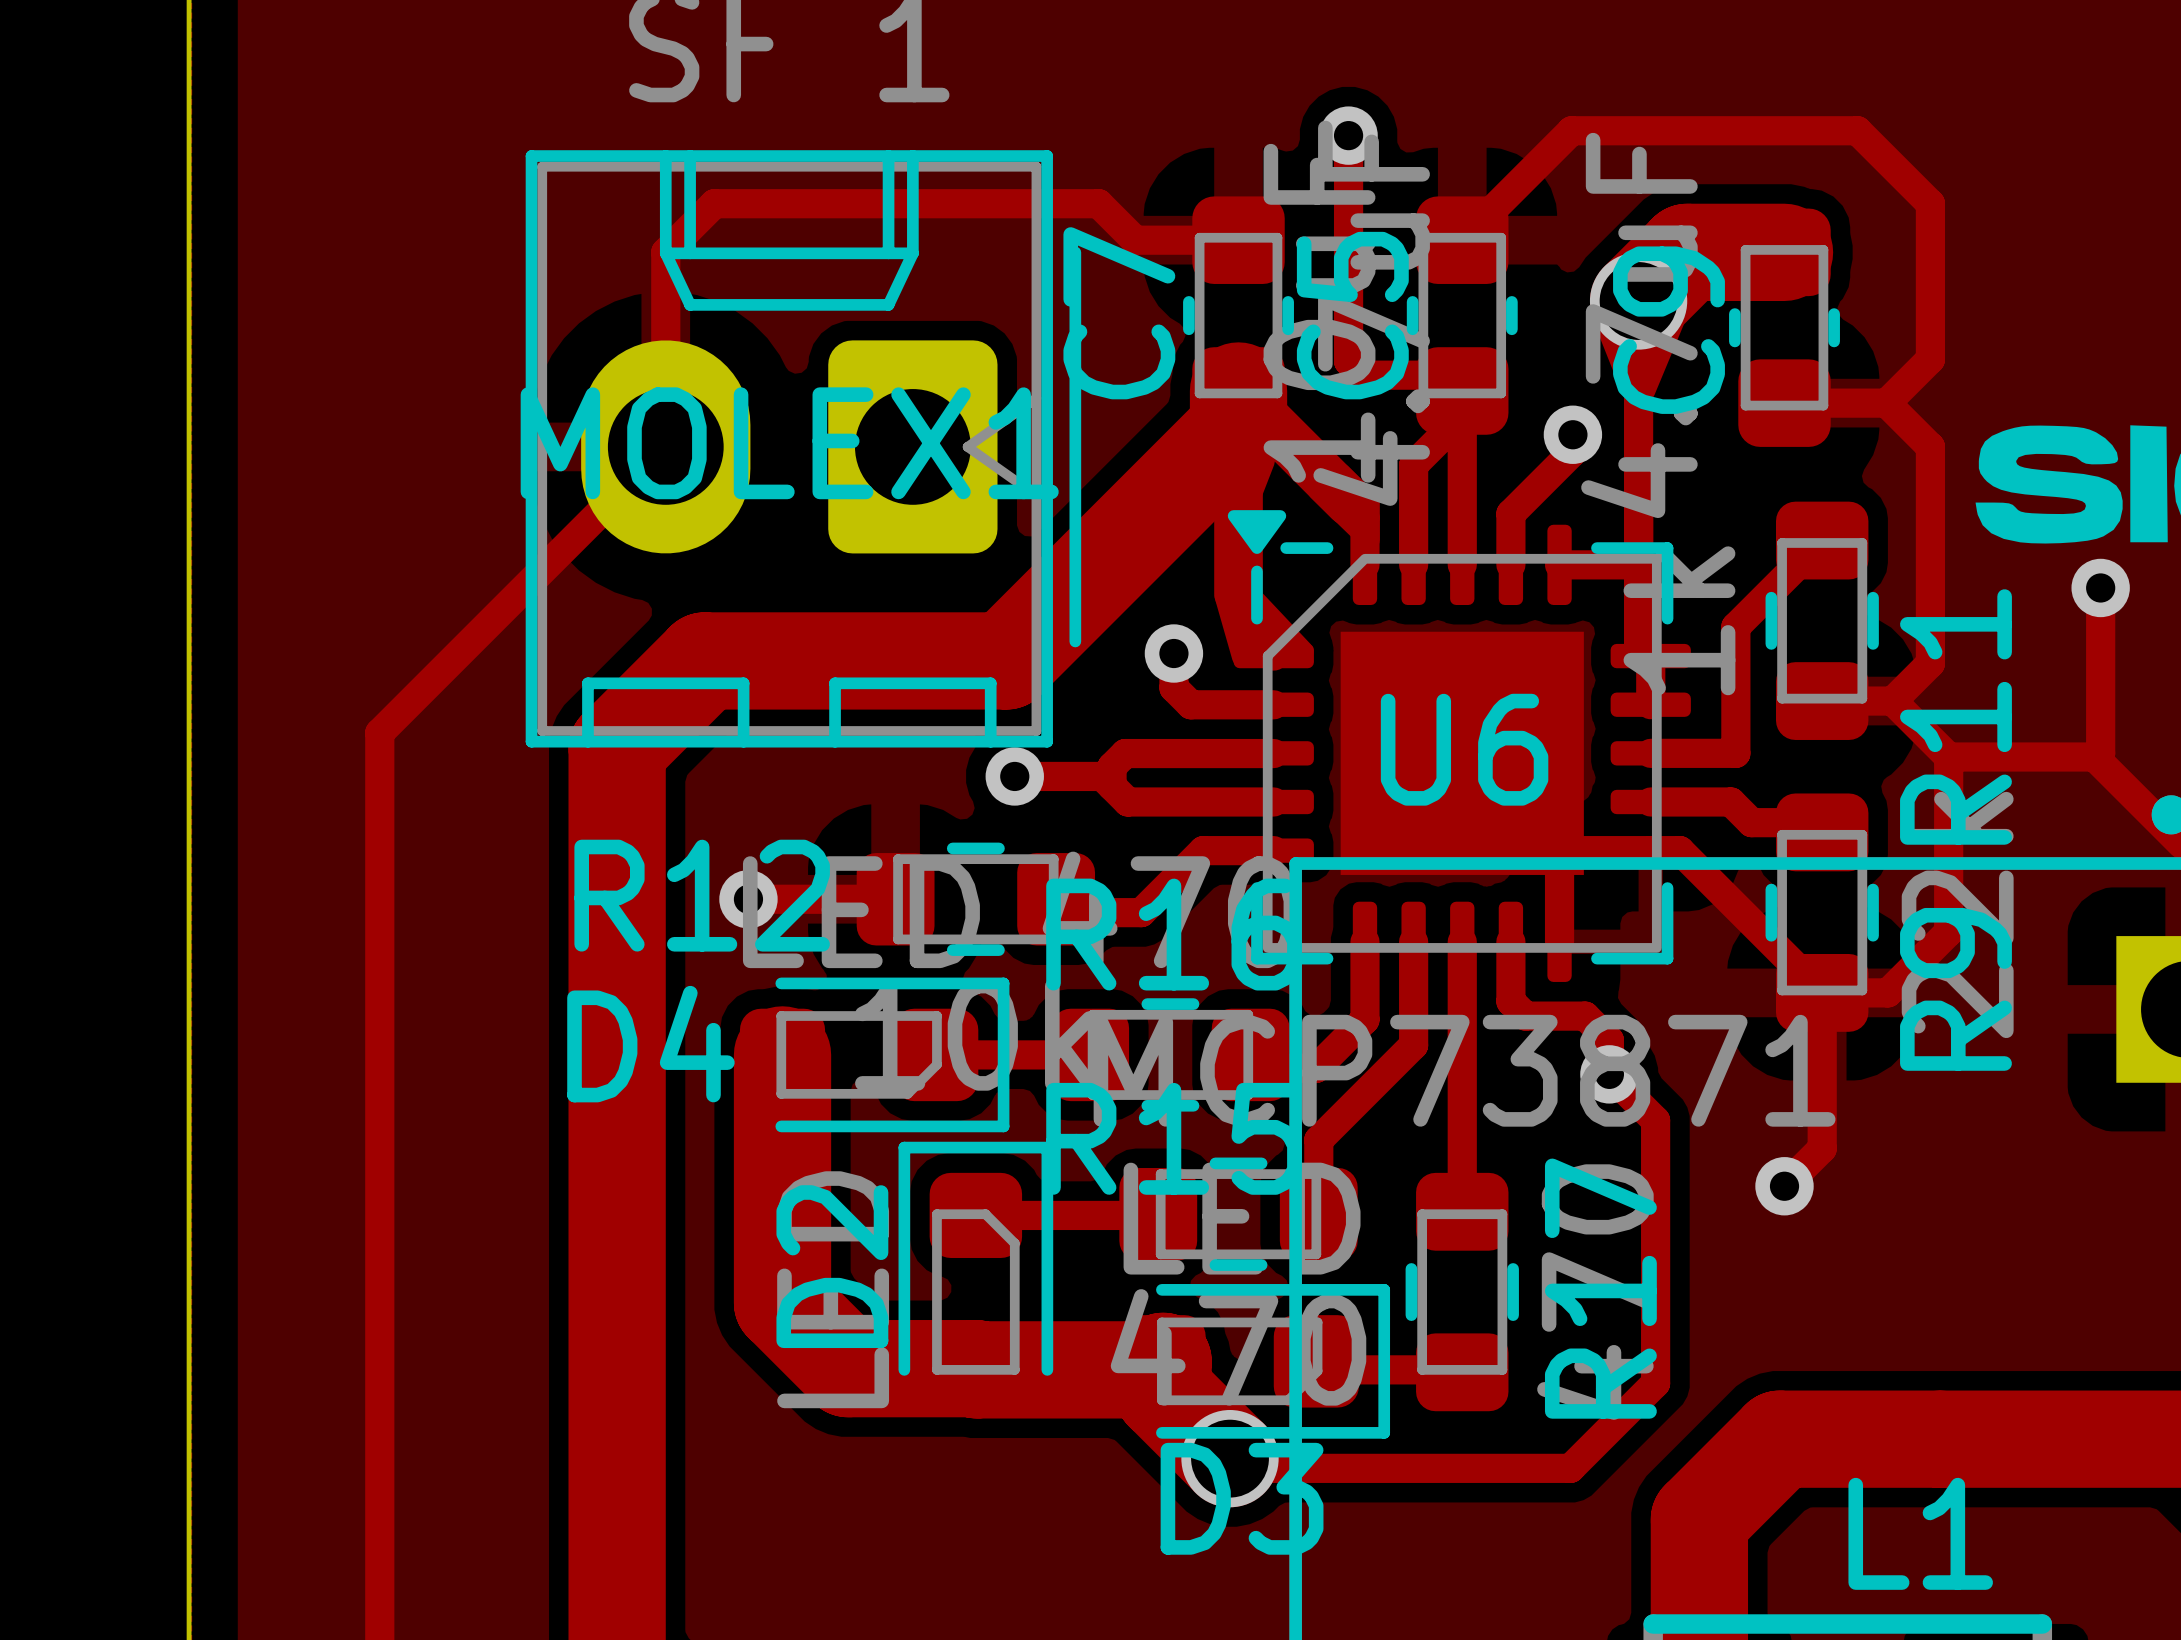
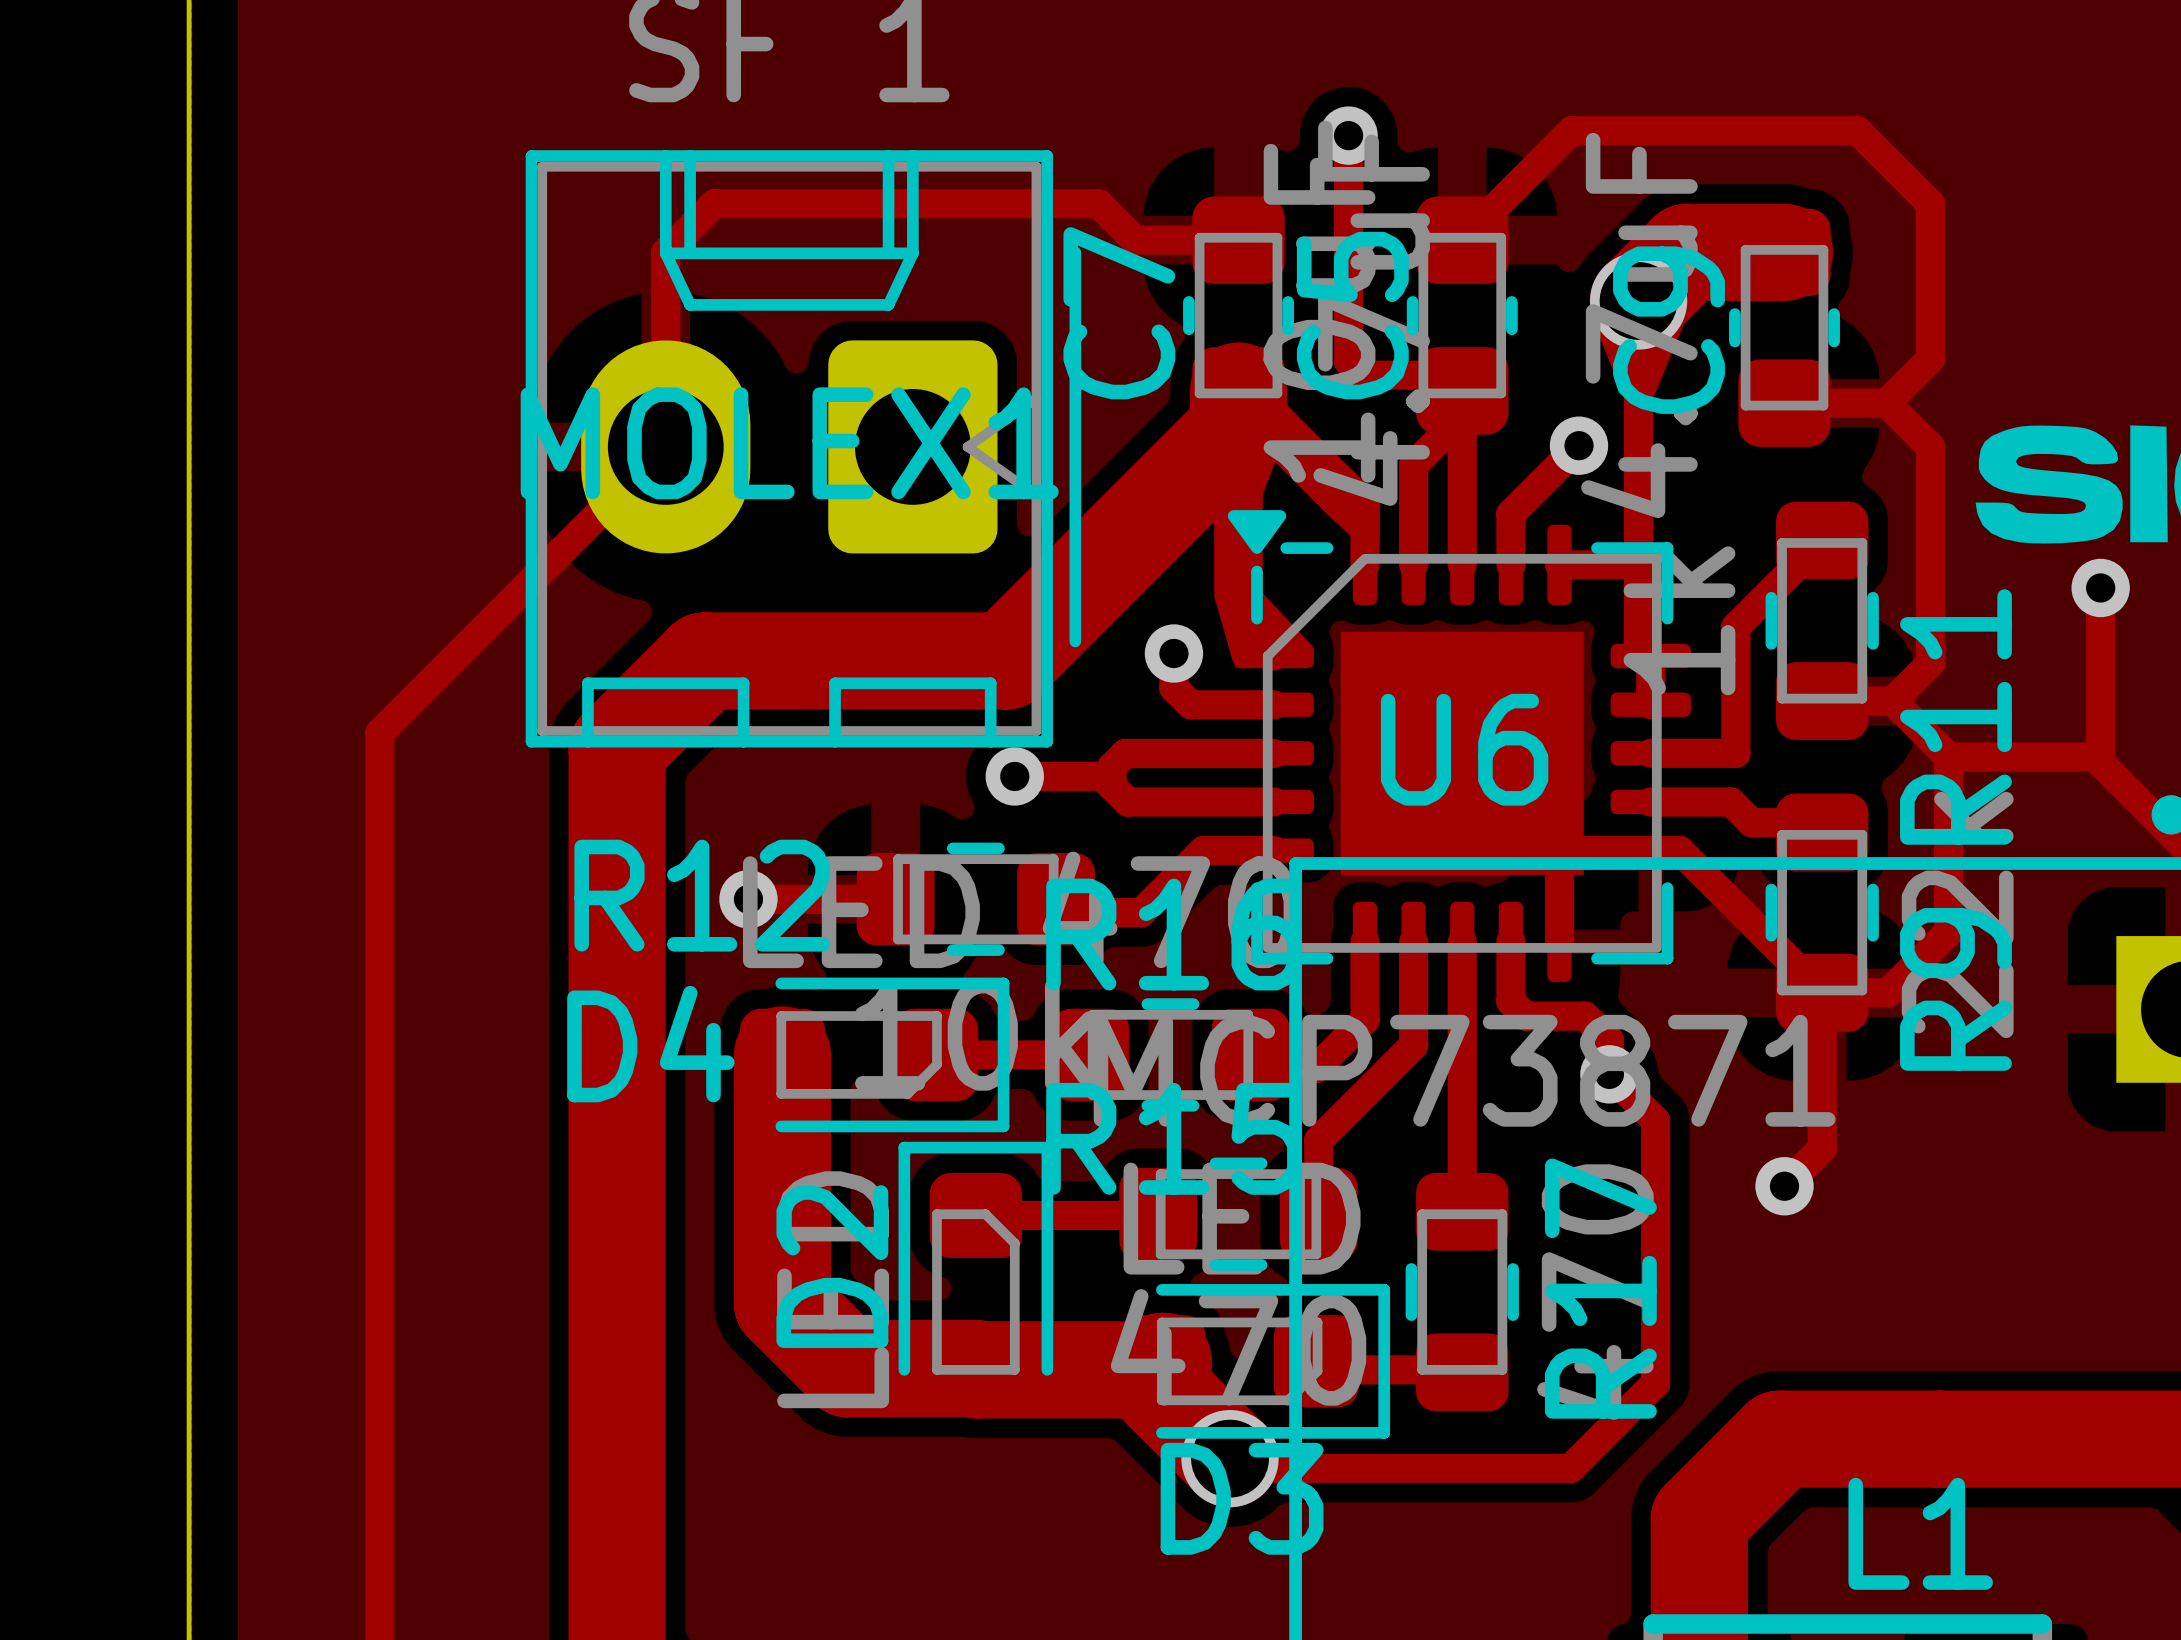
via position: (1572, 434) -> (1579, 445)

